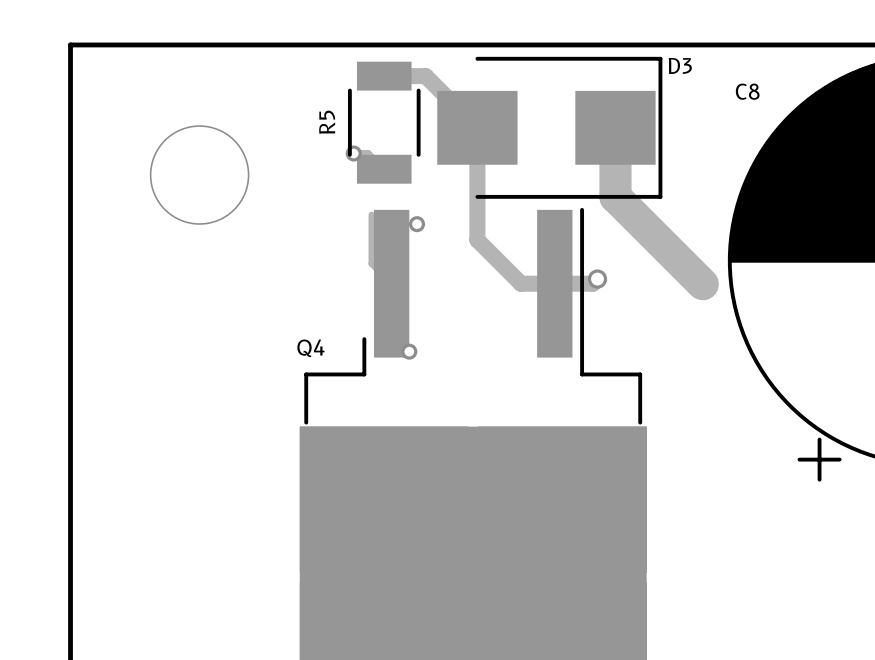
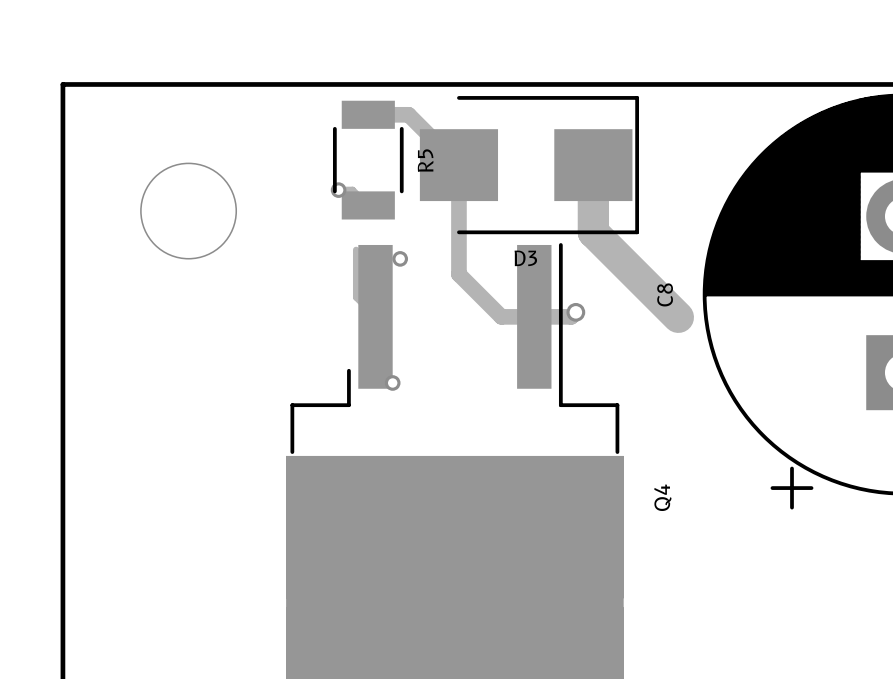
D3 name position: D3 (680, 65) -> D3 (525, 258)
C8 name rotation: 0° (747, 91) -> 90° counterclockwise (665, 294)
C8 name position: C8 (747, 91) -> C8 (665, 294)
R5 name position: R5 (327, 122) -> R5 (425, 160)
Q4 name rotation: 0° (310, 348) -> 90° counterclockwise (662, 497)
Q4 name position: Q4 (310, 348) -> Q4 (662, 497)

